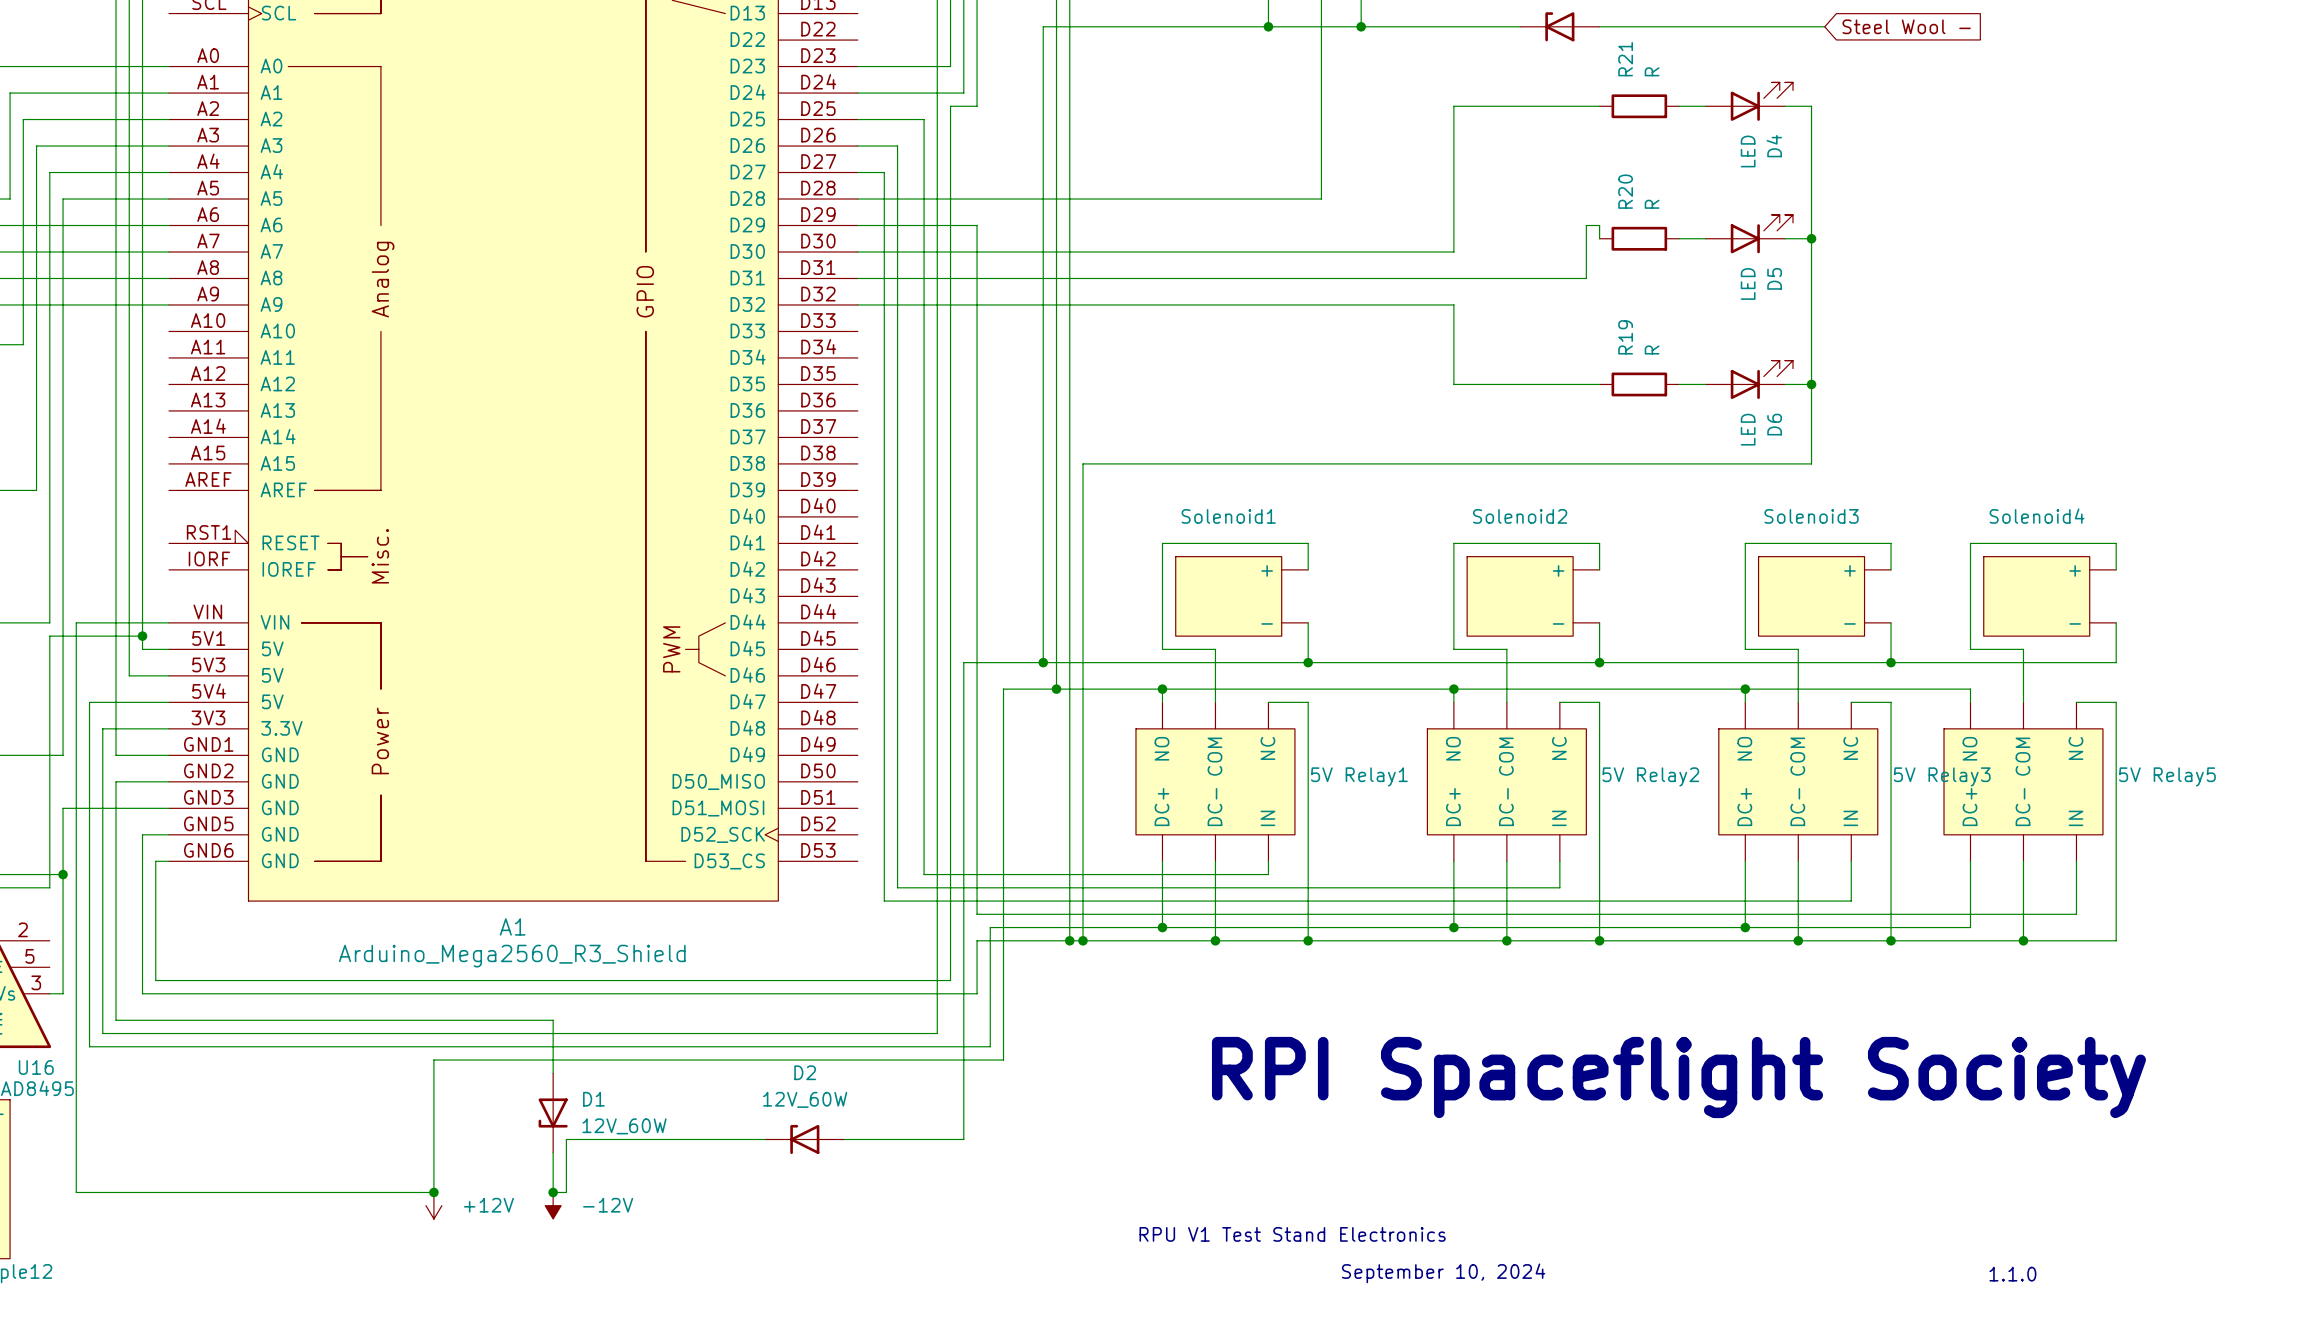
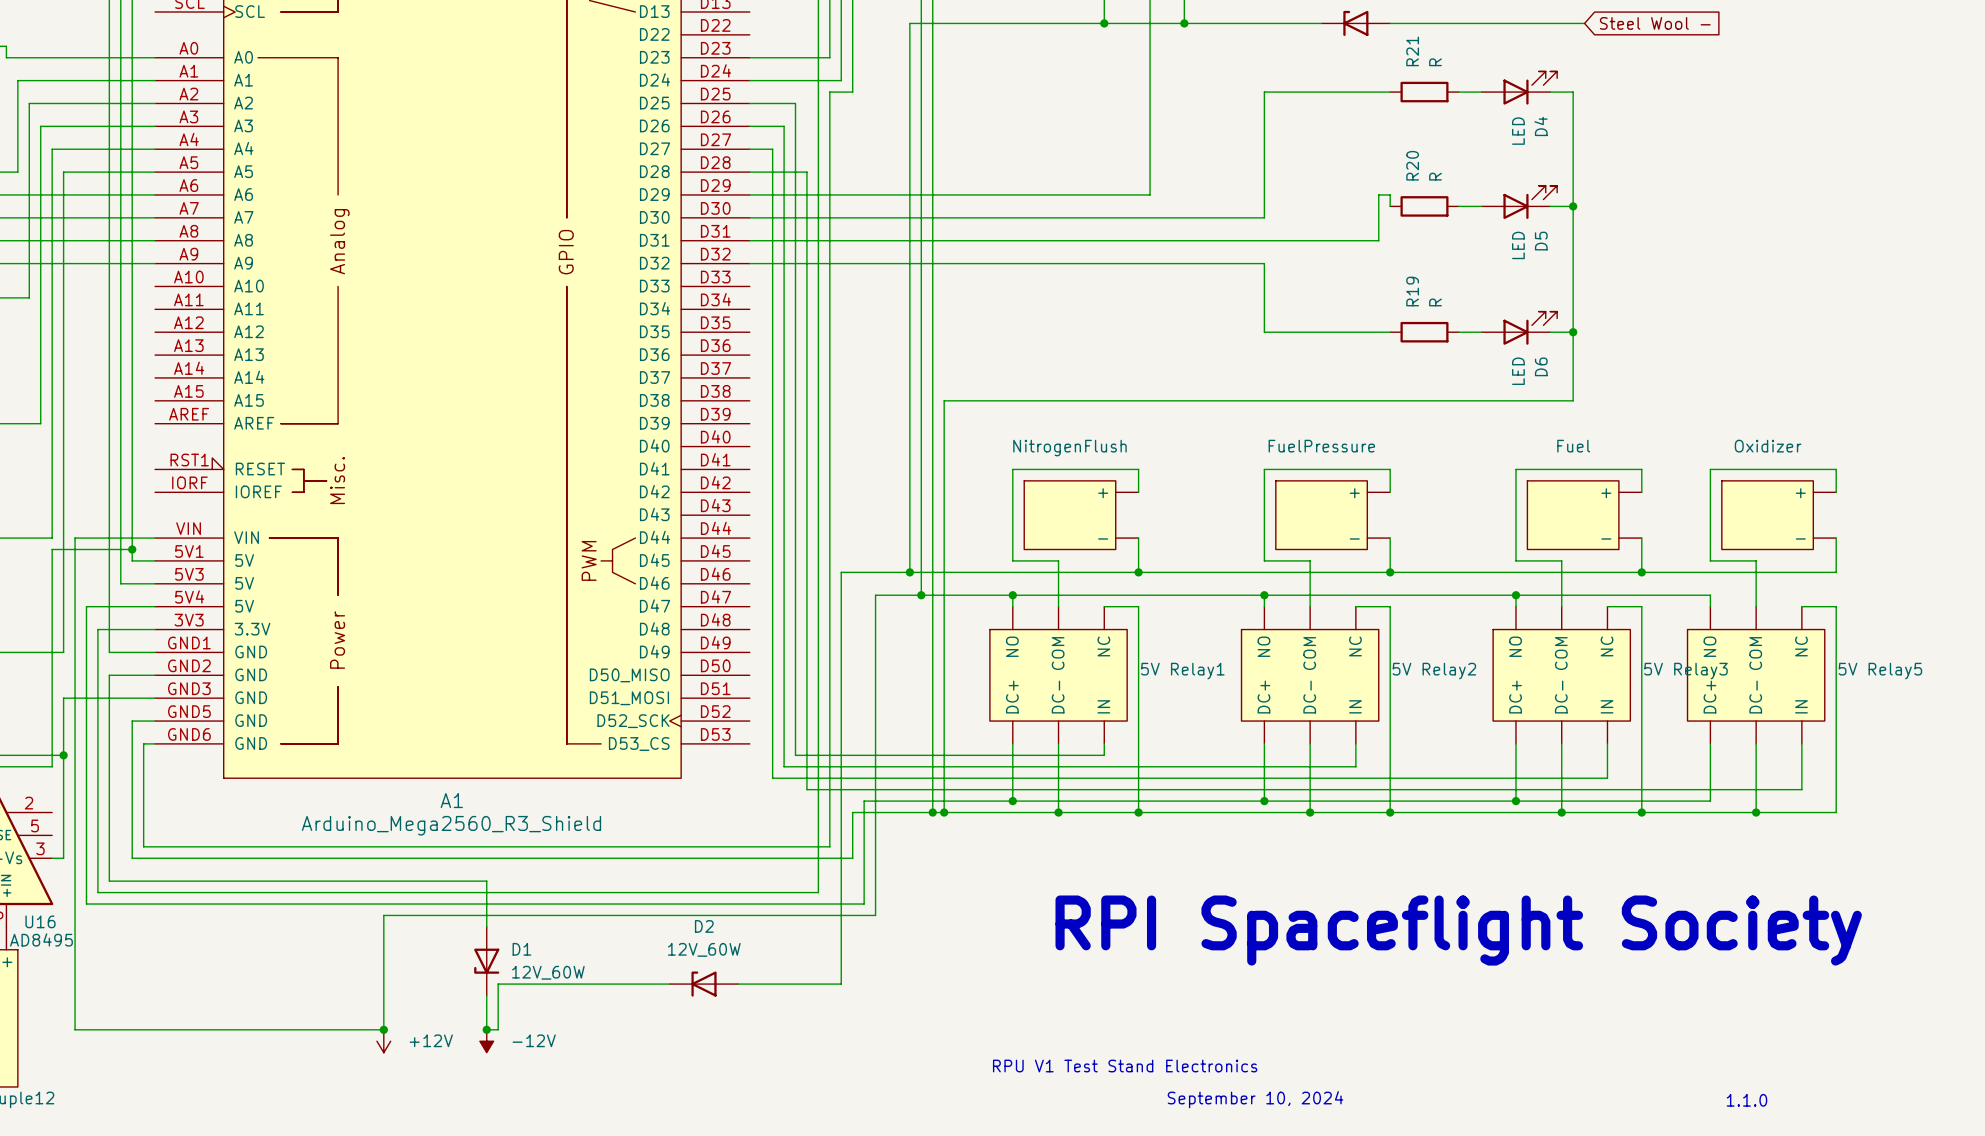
wire: (910, 119) (924, 119) (924, 199) (1321, 199) -> (852, 194) (1150, 194) (1150, 172)
wire: (977, 225) (977, 914) -> (795, 103) (795, 755) (806, 755) (806, 789) (852, 789)
Solenoid1 name: Solenoid1 (1228, 516) -> NitrogenFlush (1069, 448)
Solenoid2 name: Solenoid2 (1520, 516) -> FuelPressure (1321, 446)
Solenoid3 name: Solenoid3 (1811, 516) -> Fuel (1573, 446)
Solenoid4 name: Solenoid4 (2037, 516) -> Oxidizer (1768, 446)

